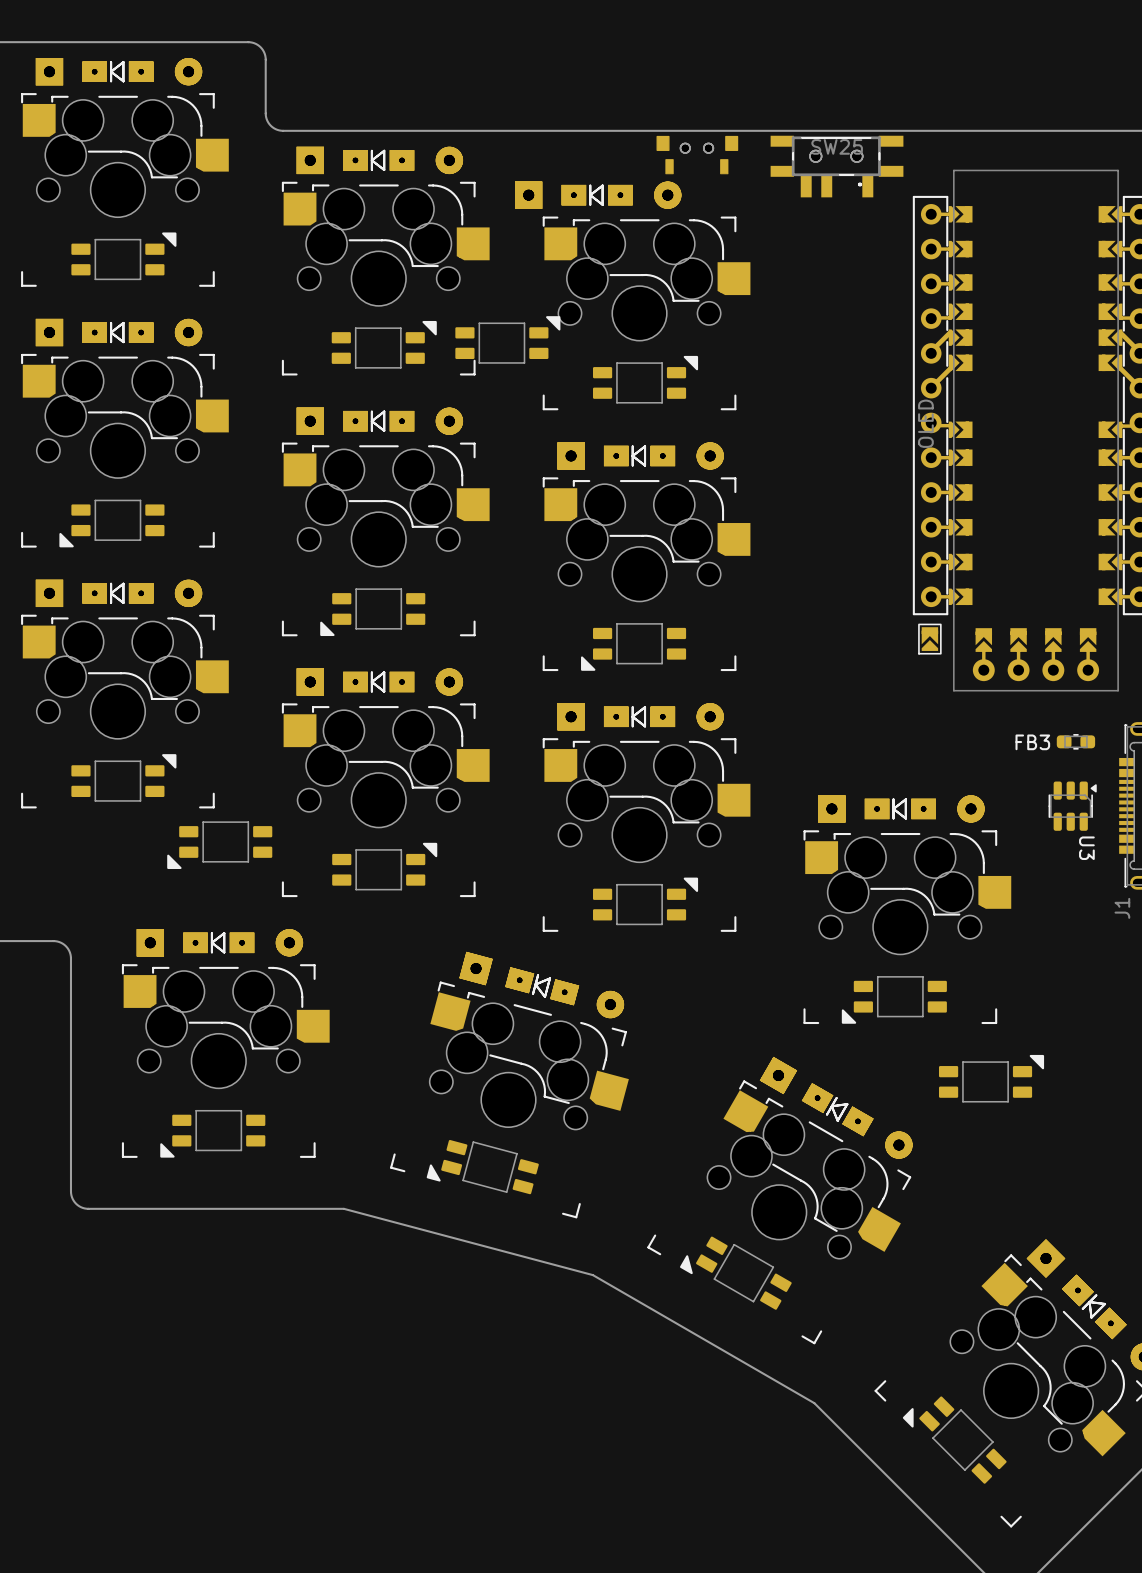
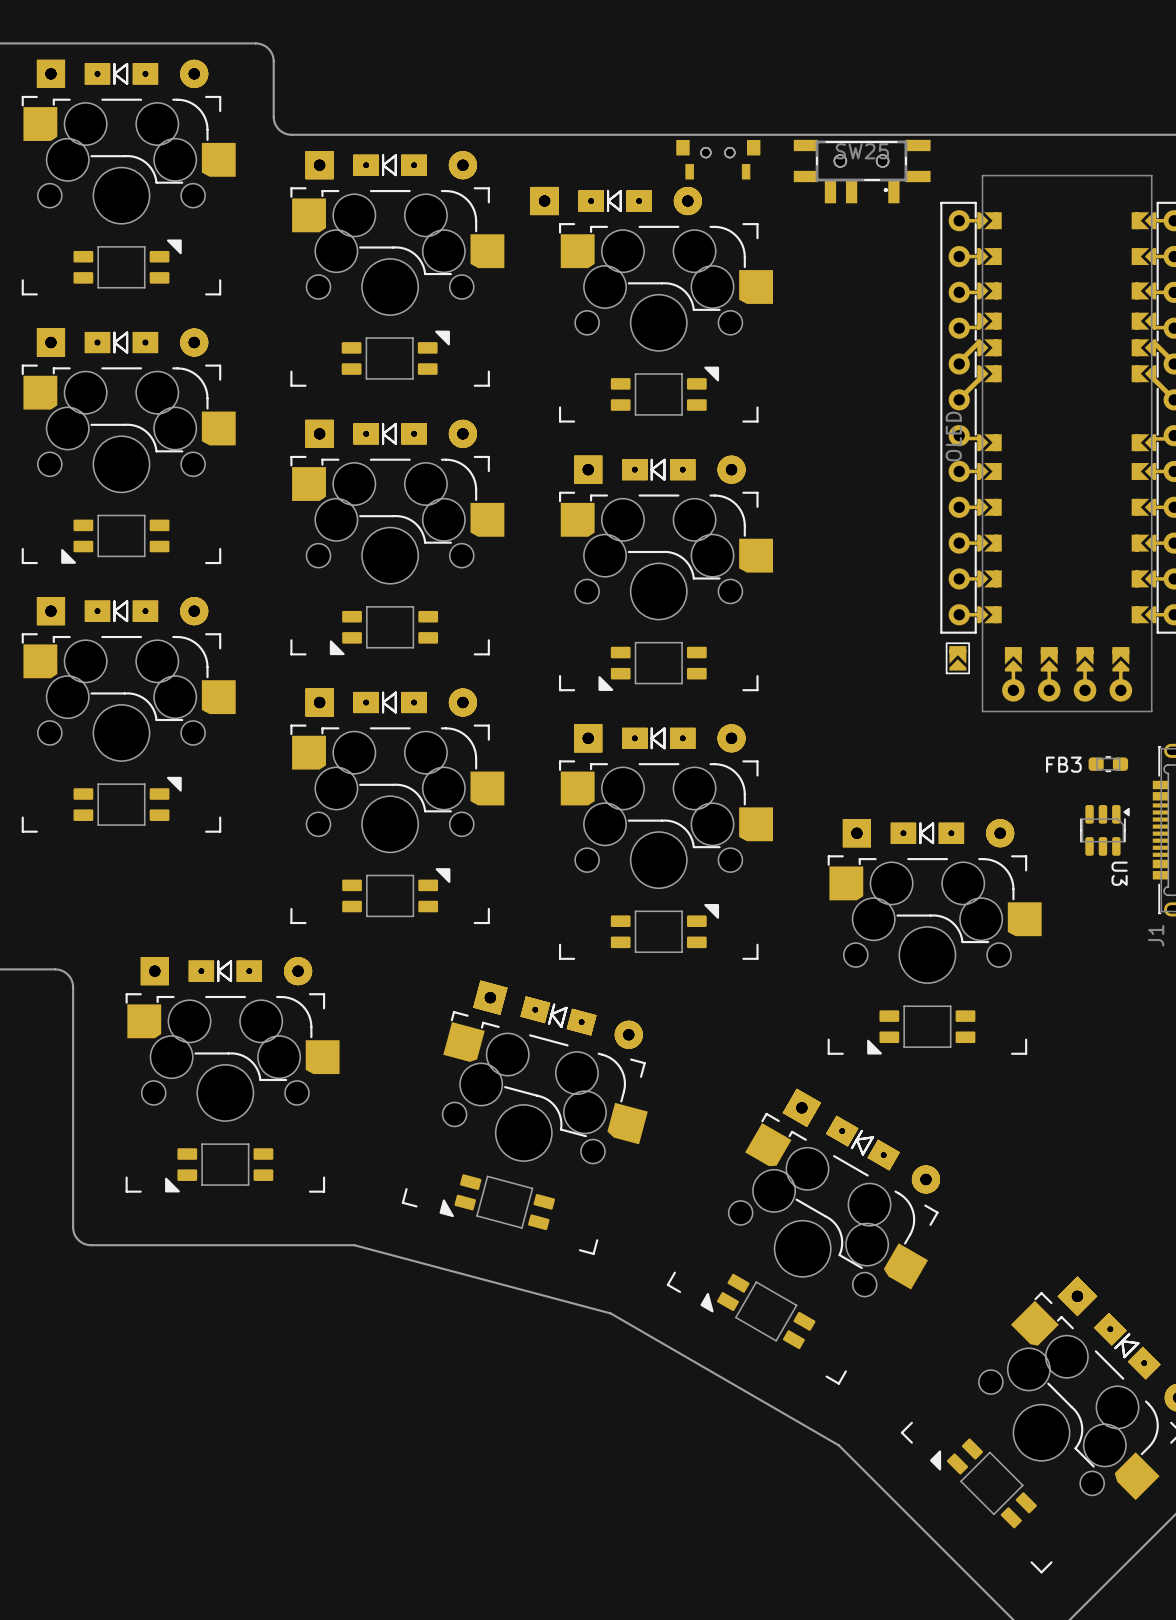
part: (507, 339) -> none
part: (219, 845) -> none
part: (991, 1078) -> none

